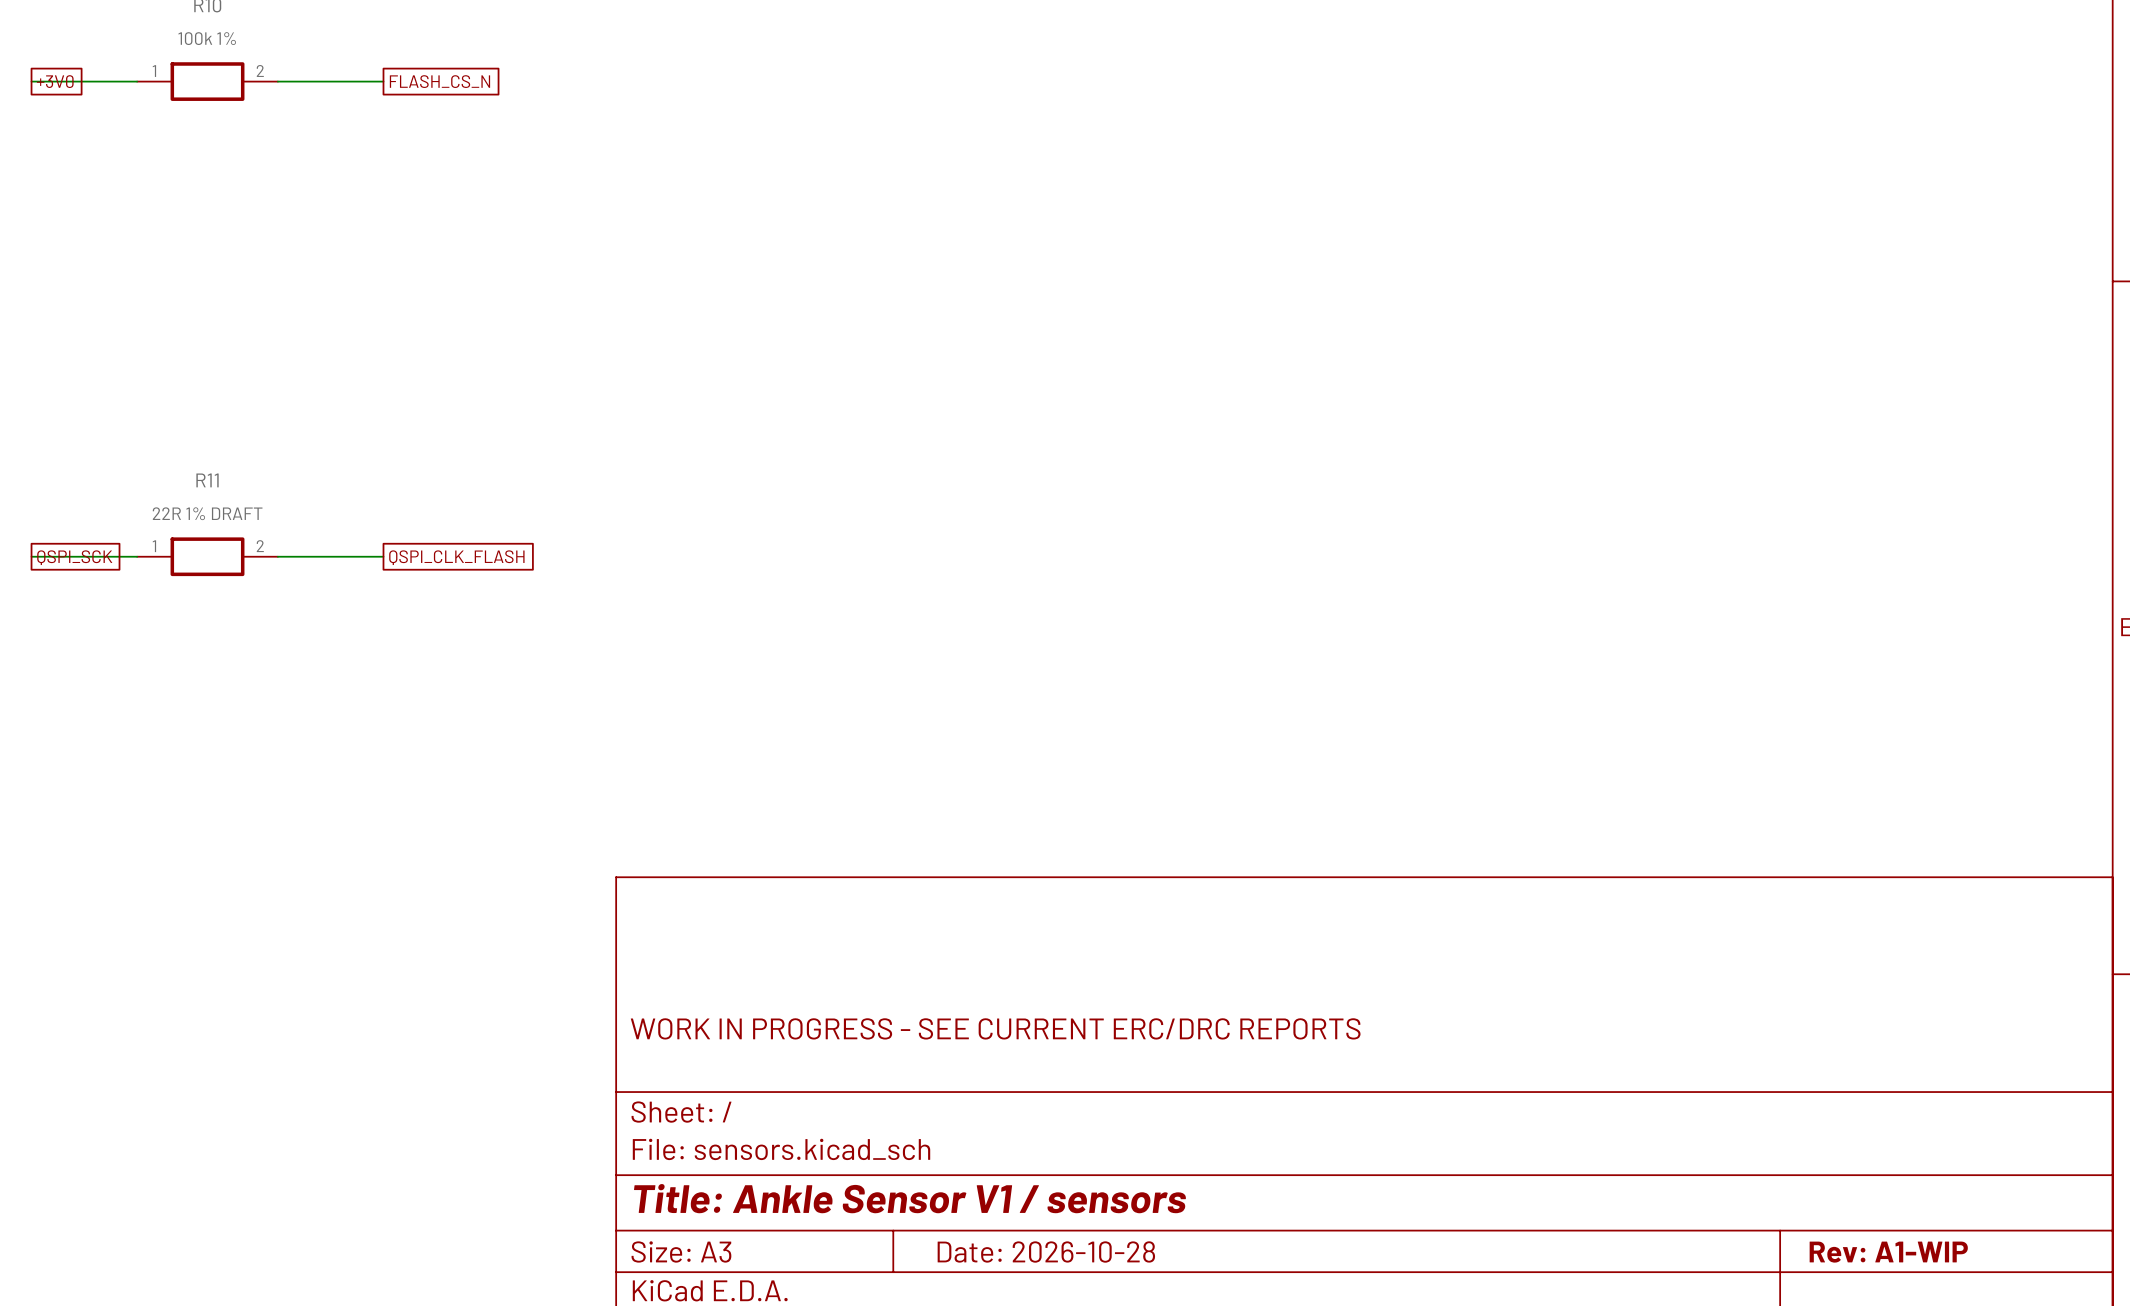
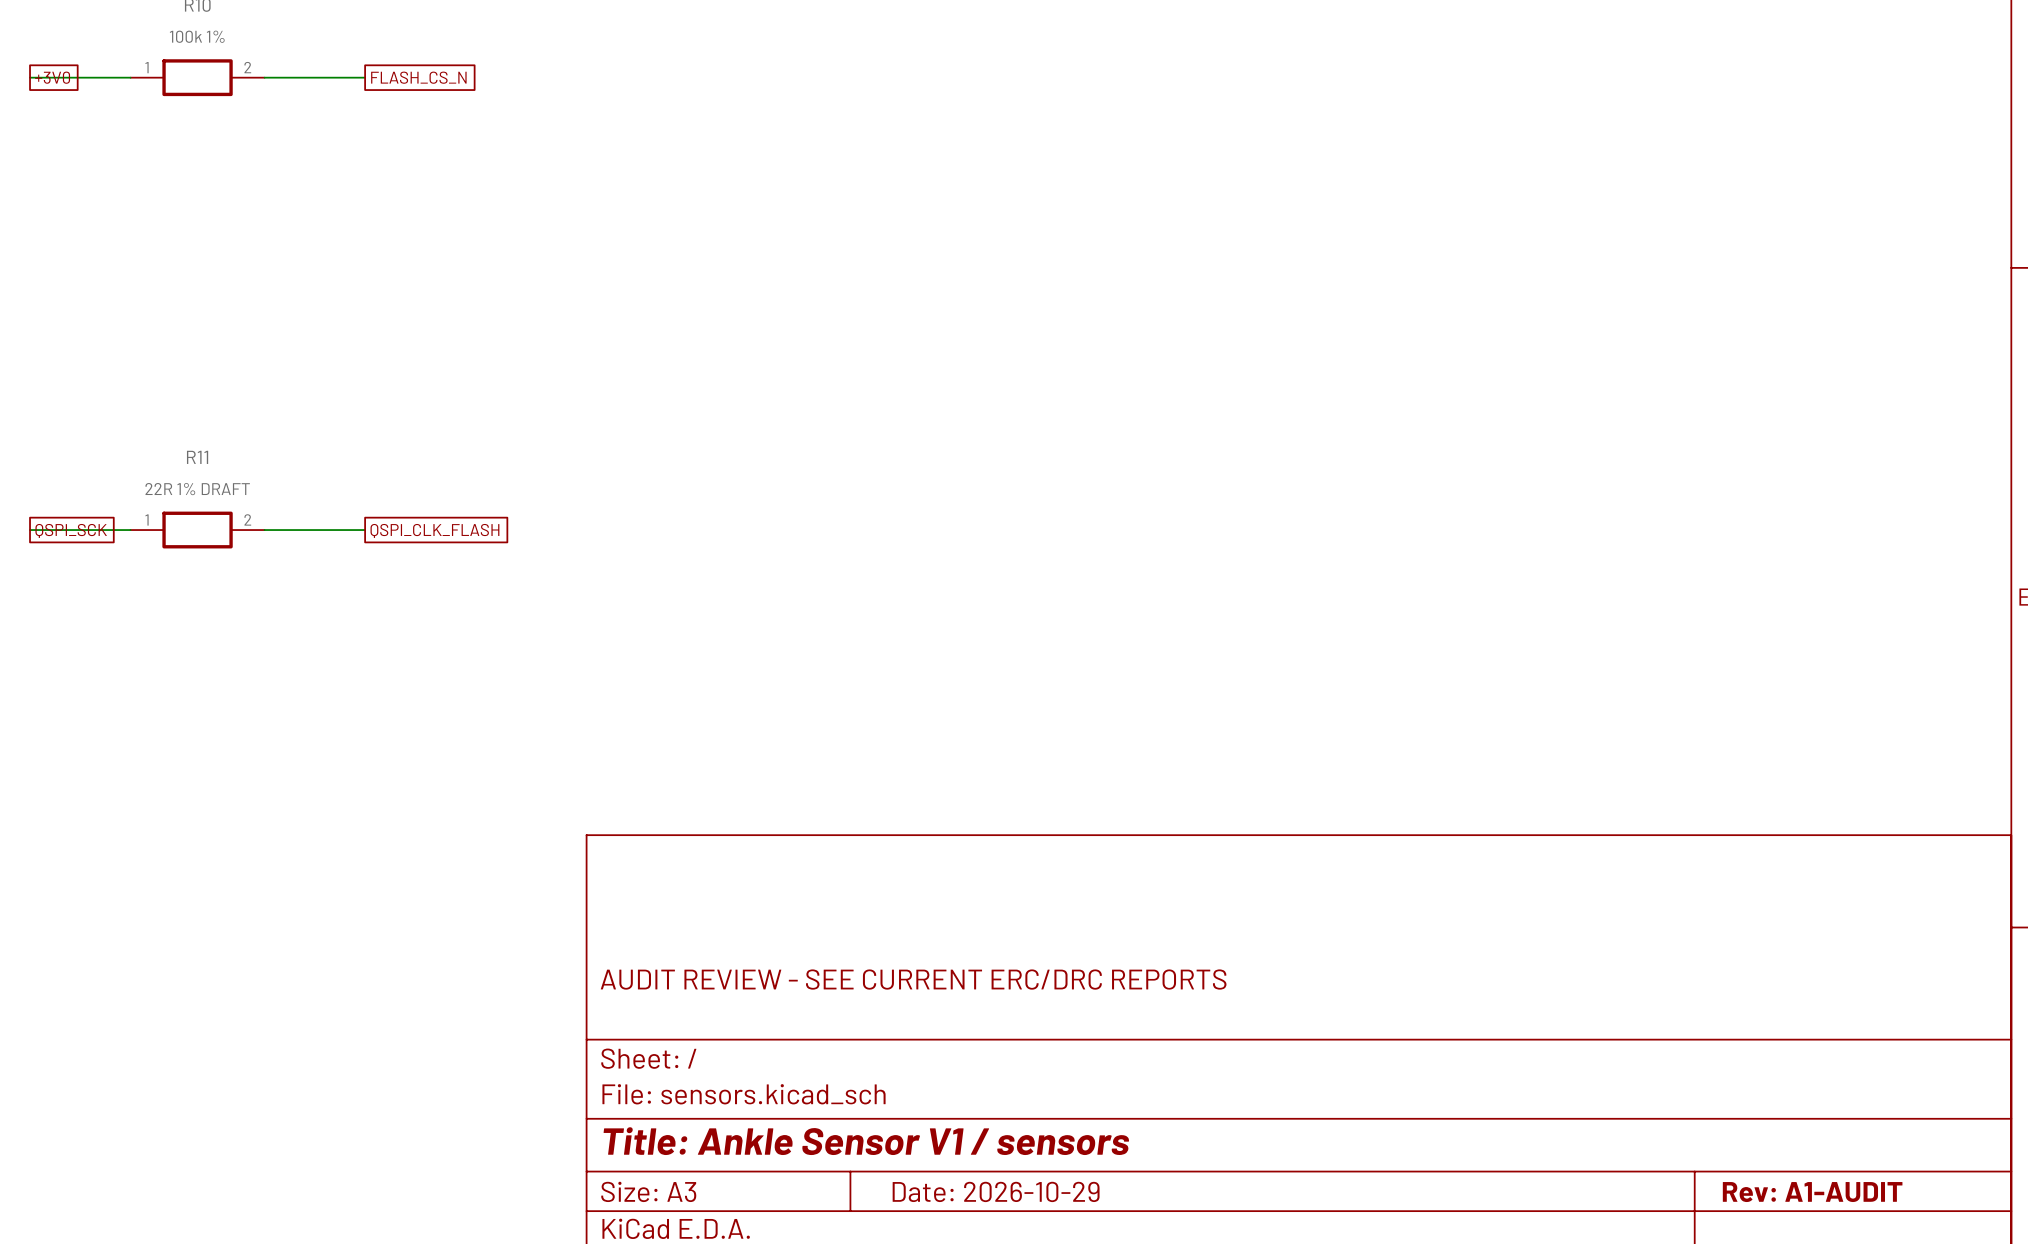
title block: WORK IN PROGRESS - SEE CURRENT ERC/DRC REPORTS (995, 1028) -> AUDIT REVIEW - SEE CURRENT ERC/DRC REPORTS (913, 979)
title block: Date: 2026-10-28 (1046, 1251) -> Date: 2026-10-29 (996, 1191)
title block: Rev: A1-WIP (1888, 1252) -> Rev: A1-AUDIT (1812, 1192)

